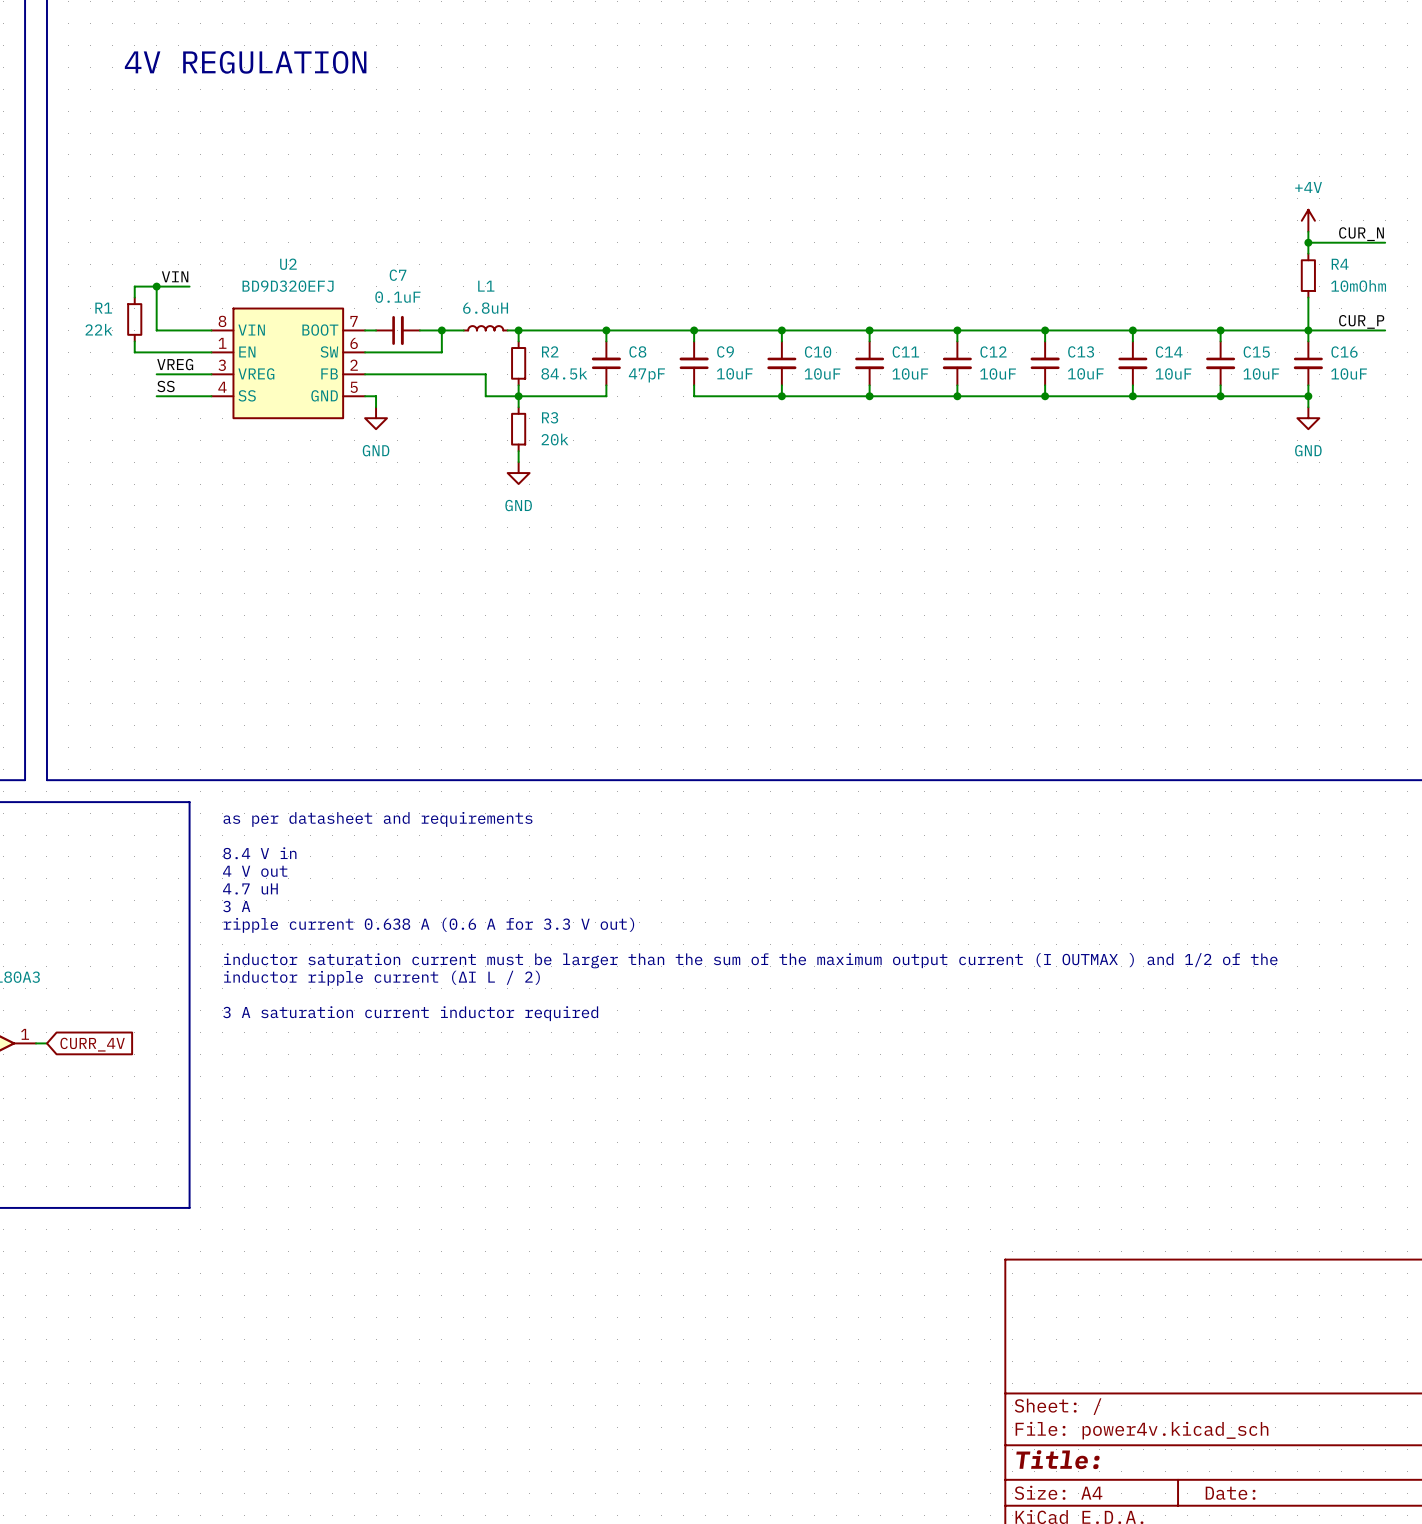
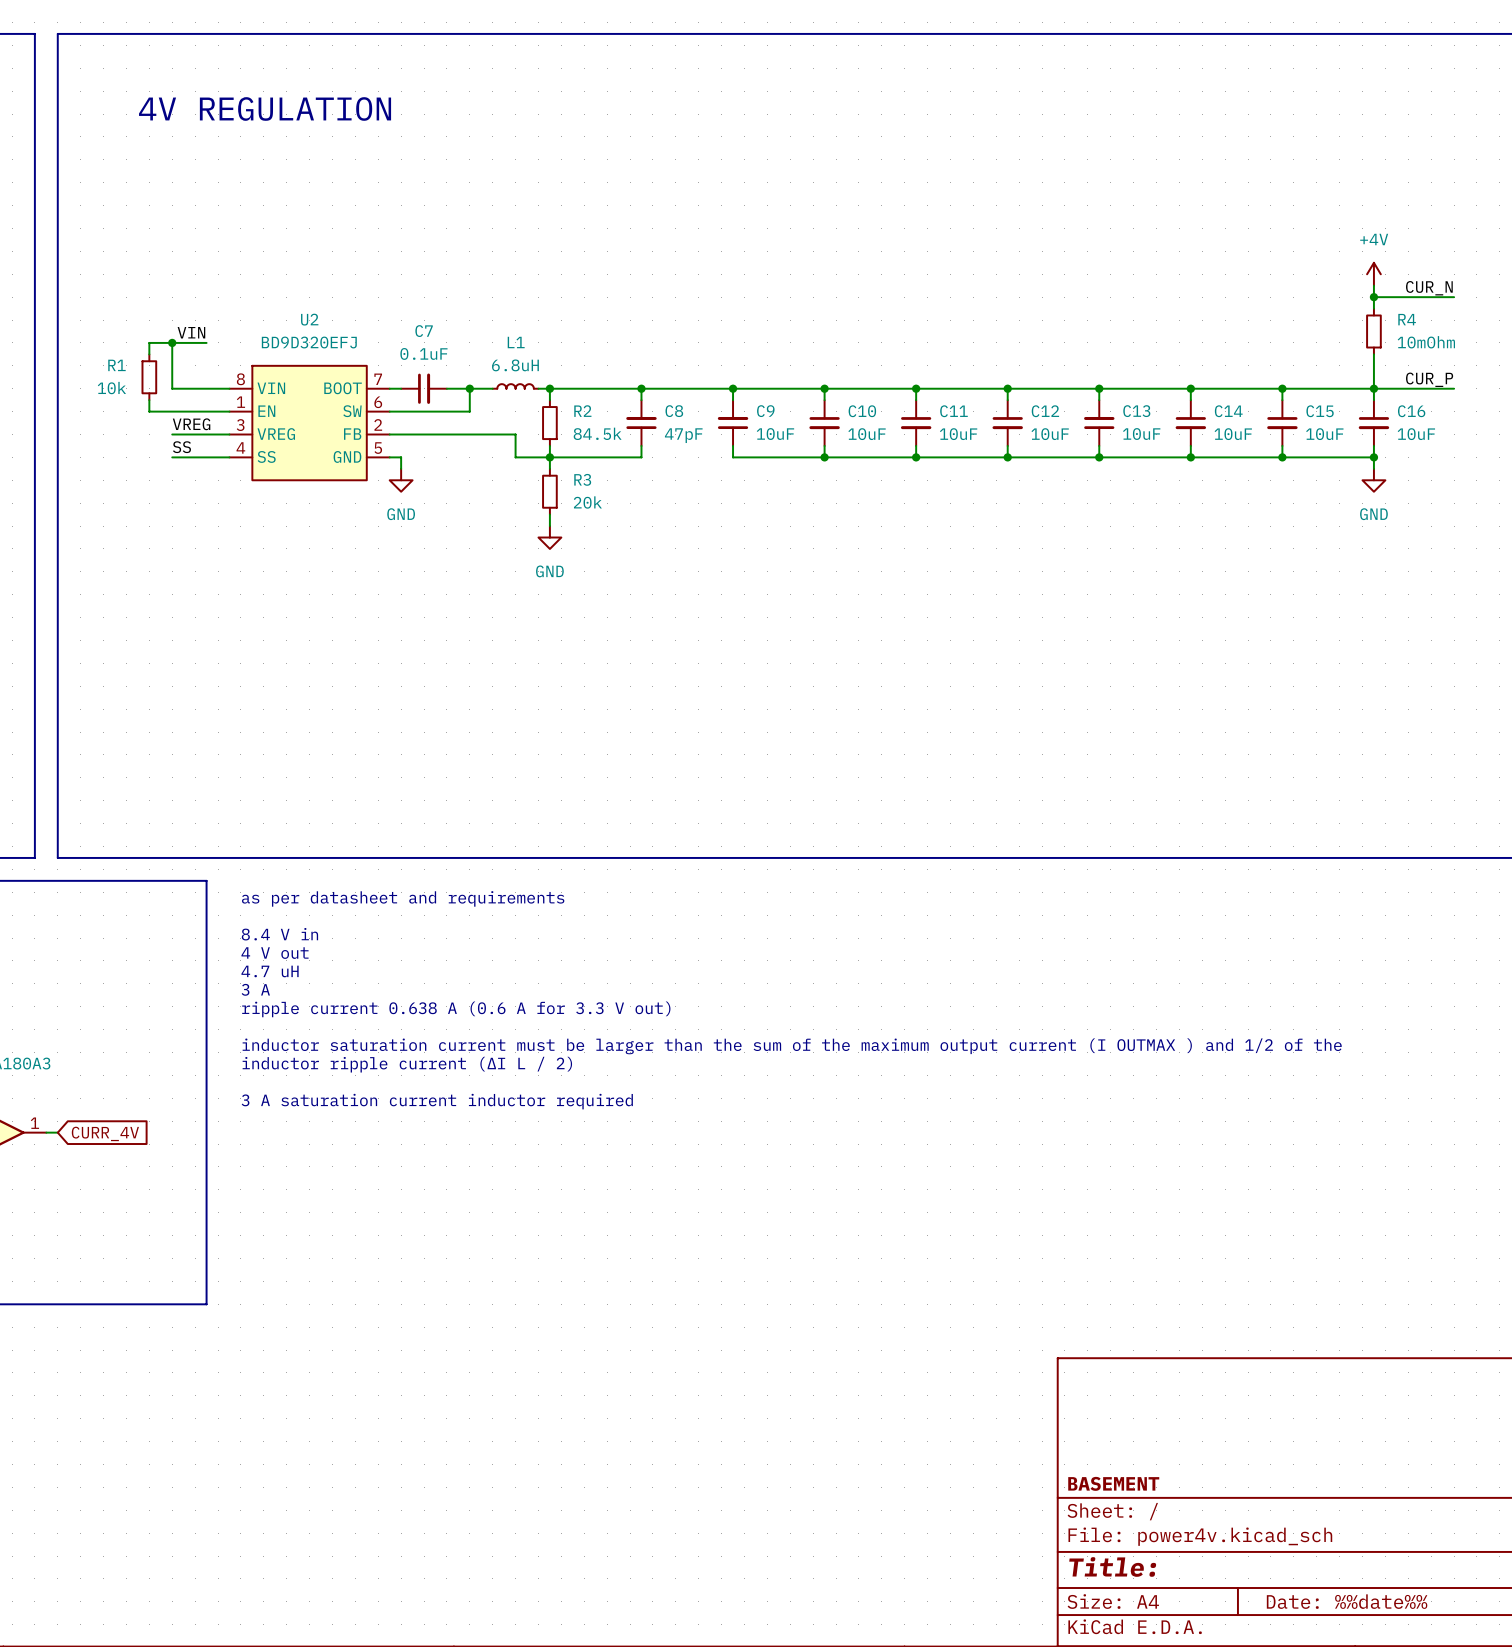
R1 value: 22k (98, 329) -> 10k (111, 388)
title block: none -> BASEMENT (1113, 1483)
title block: Date: (1230, 1493) -> Date: %%date%% (1347, 1601)

